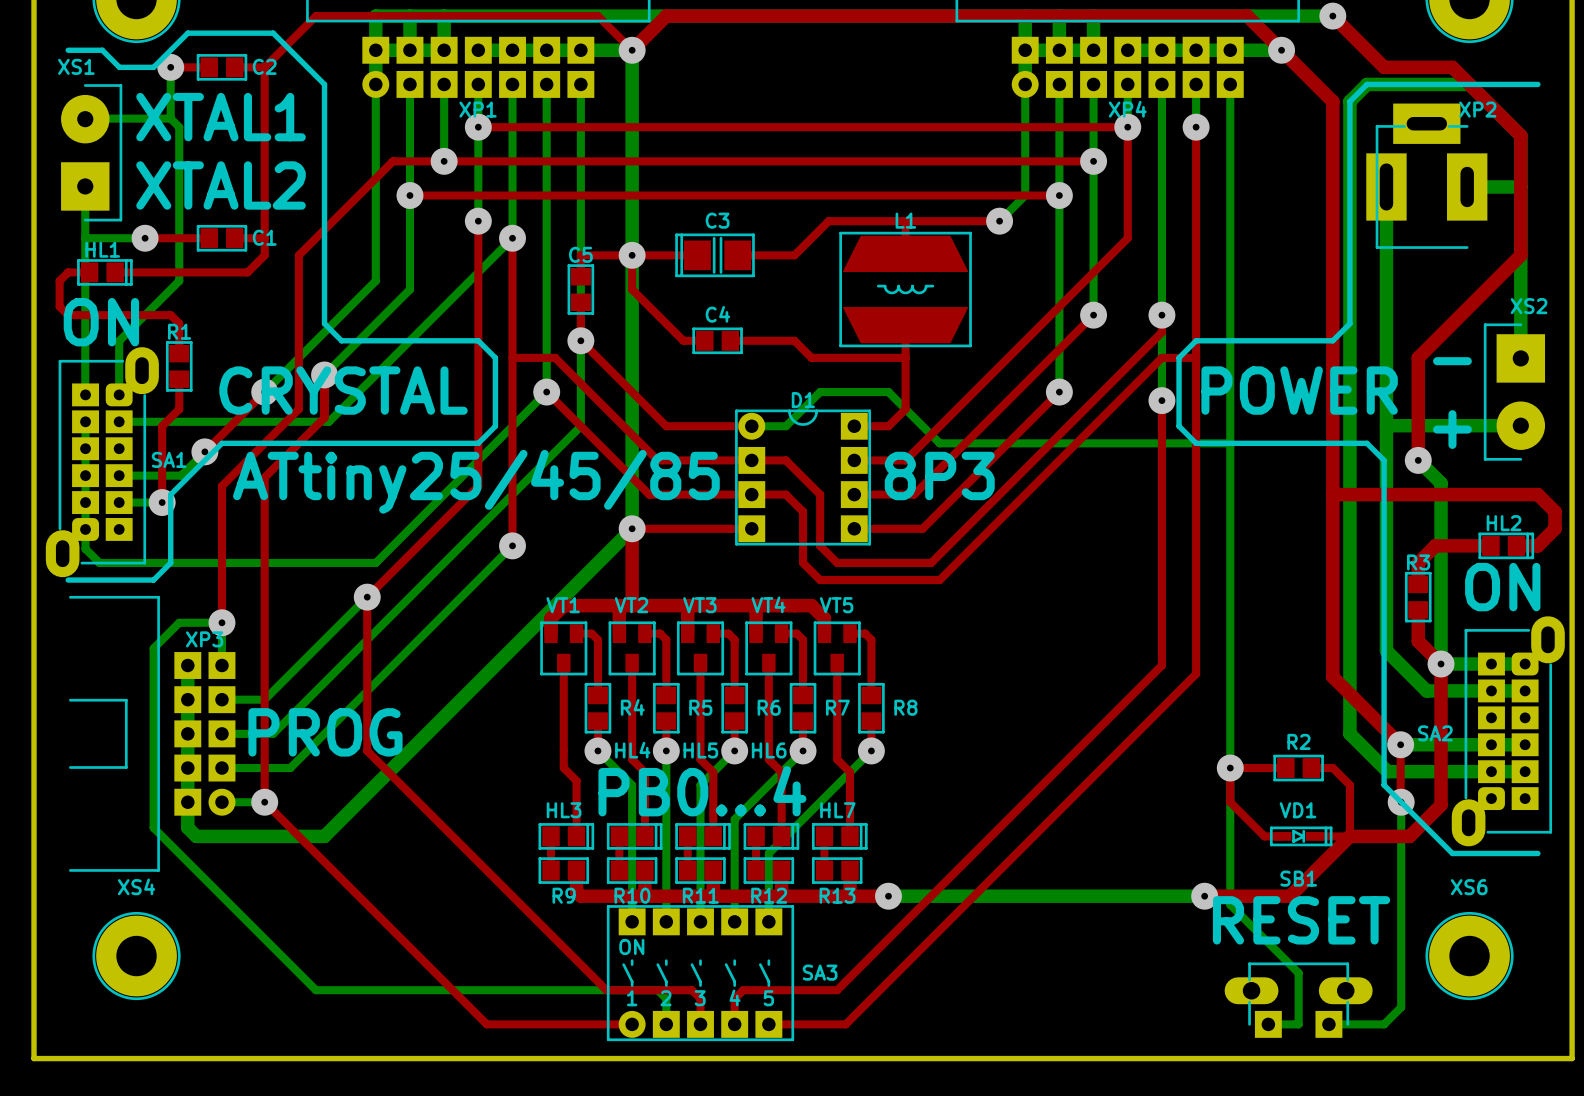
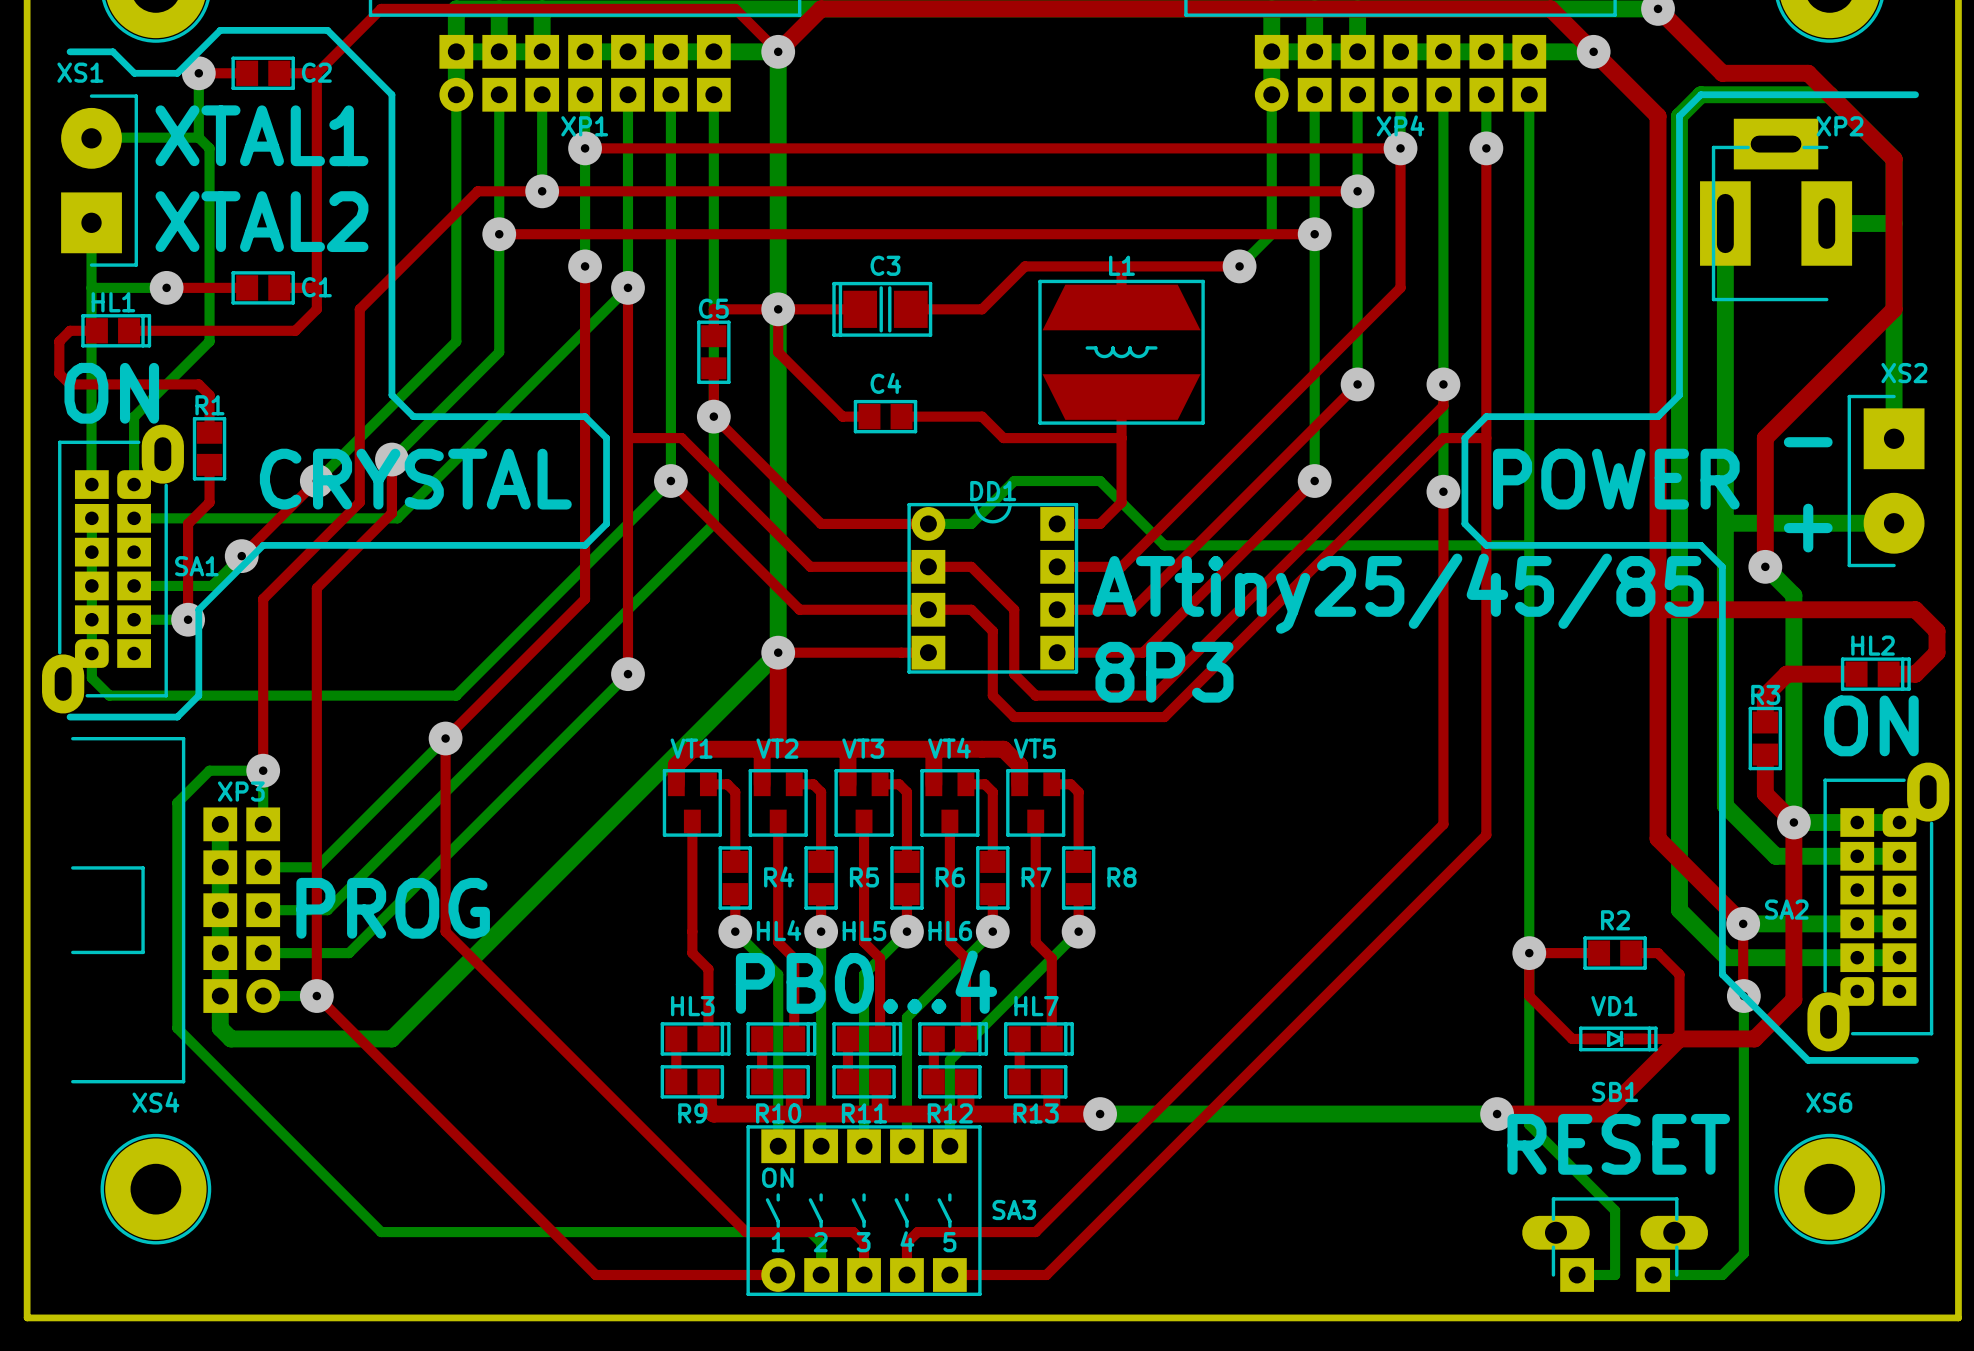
D1 name: D1 (803, 400) -> DD1 (993, 491)
text position: 8P3 (939, 476) -> 8P3 (1164, 672)
text: ATtiny25/45/85 (476, 481) -> none
text: none -> ATtiny25/45/85 (1398, 593)

